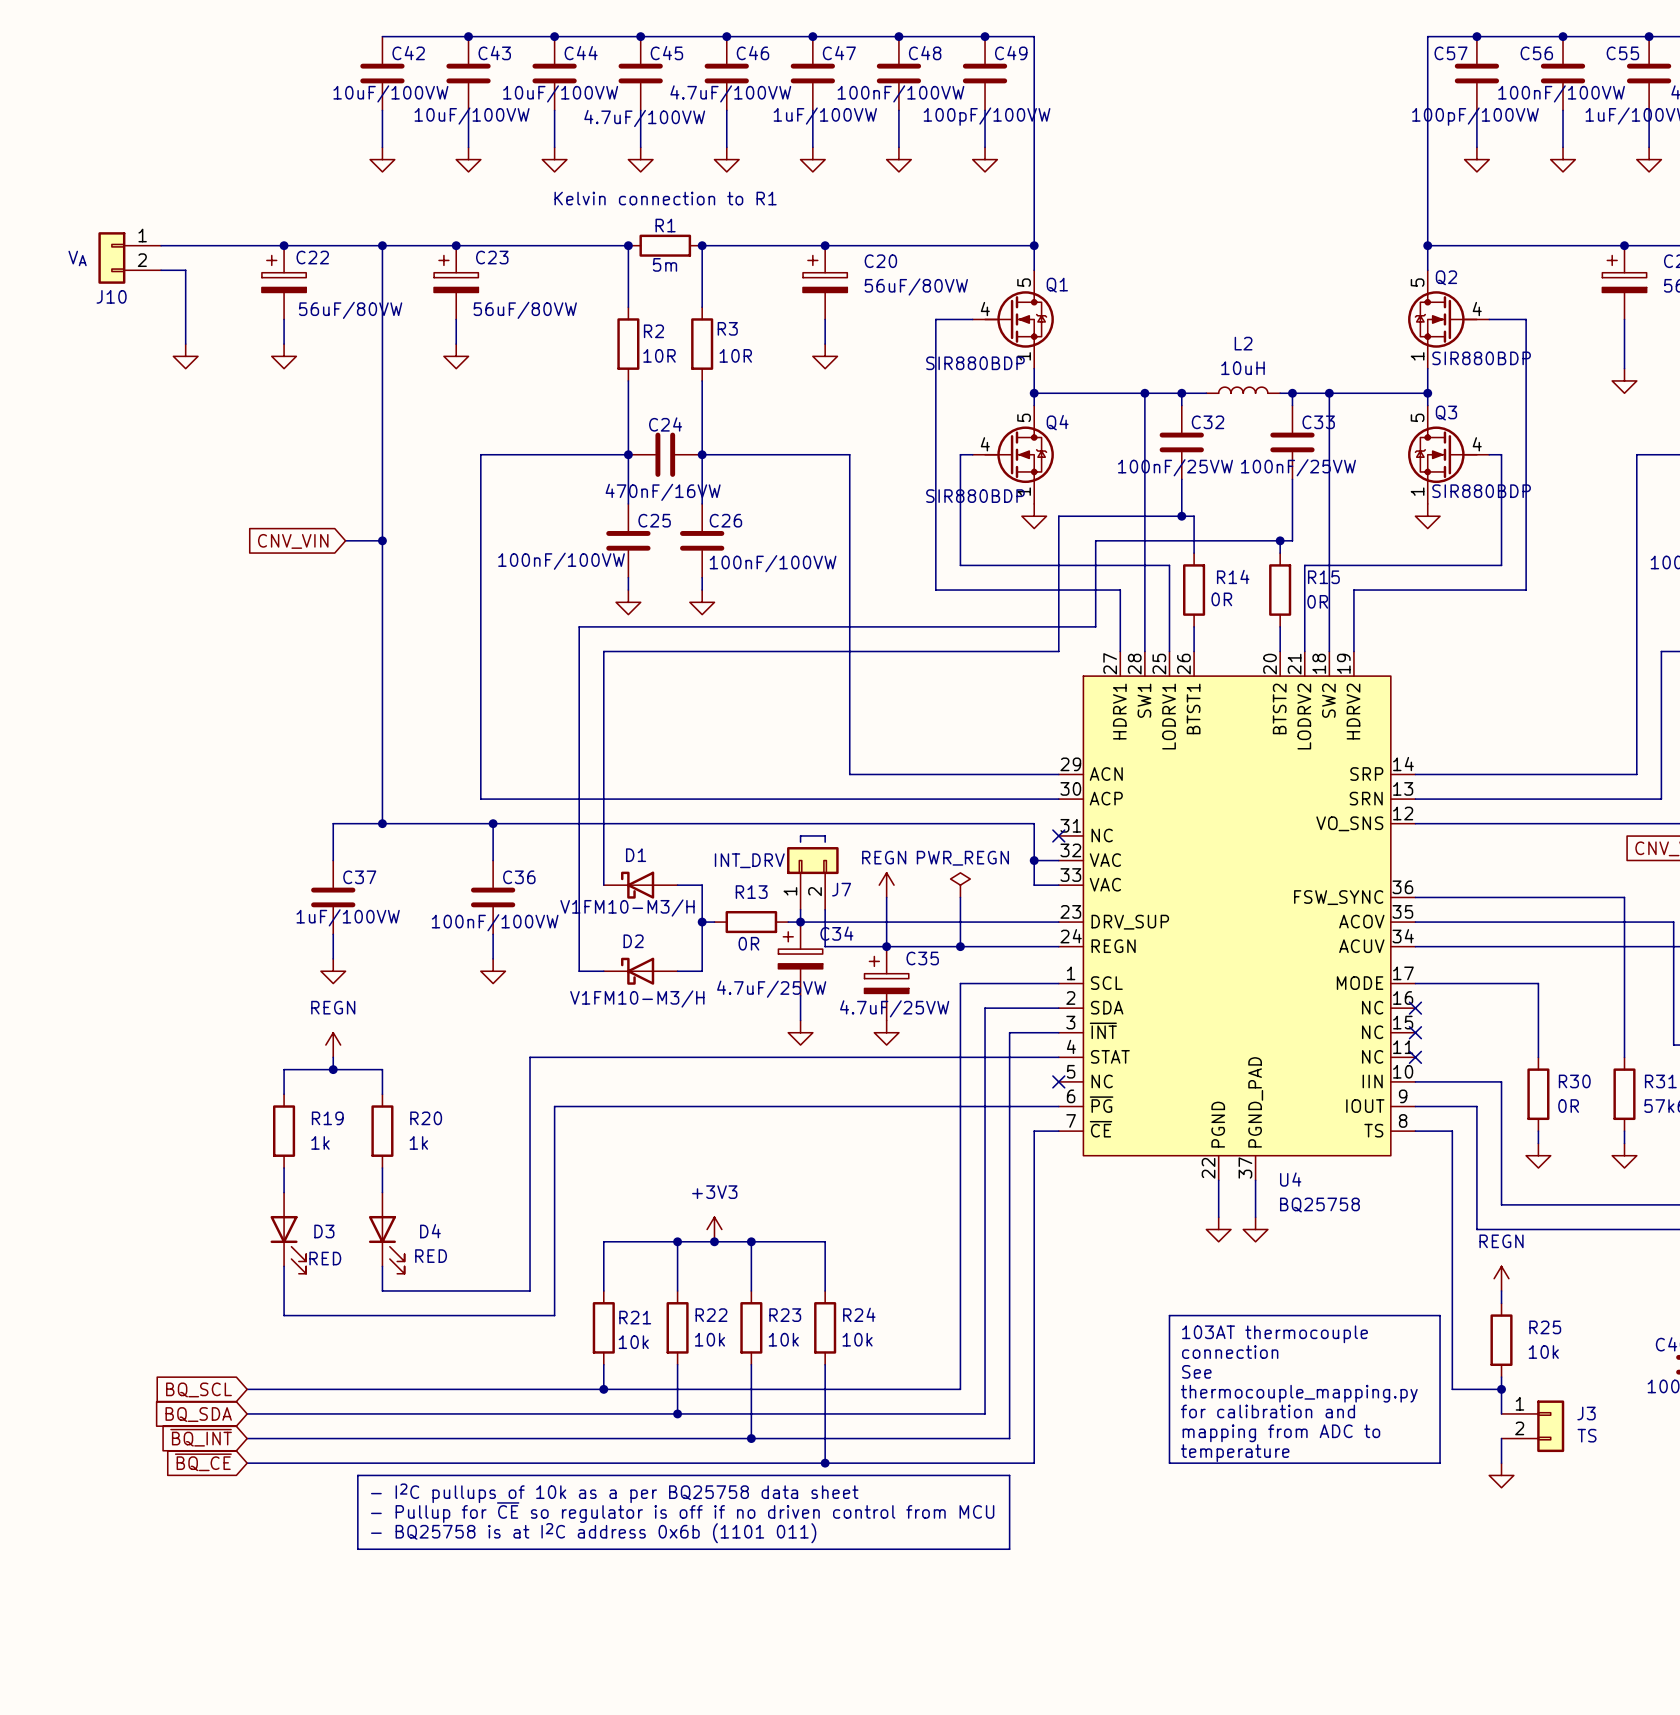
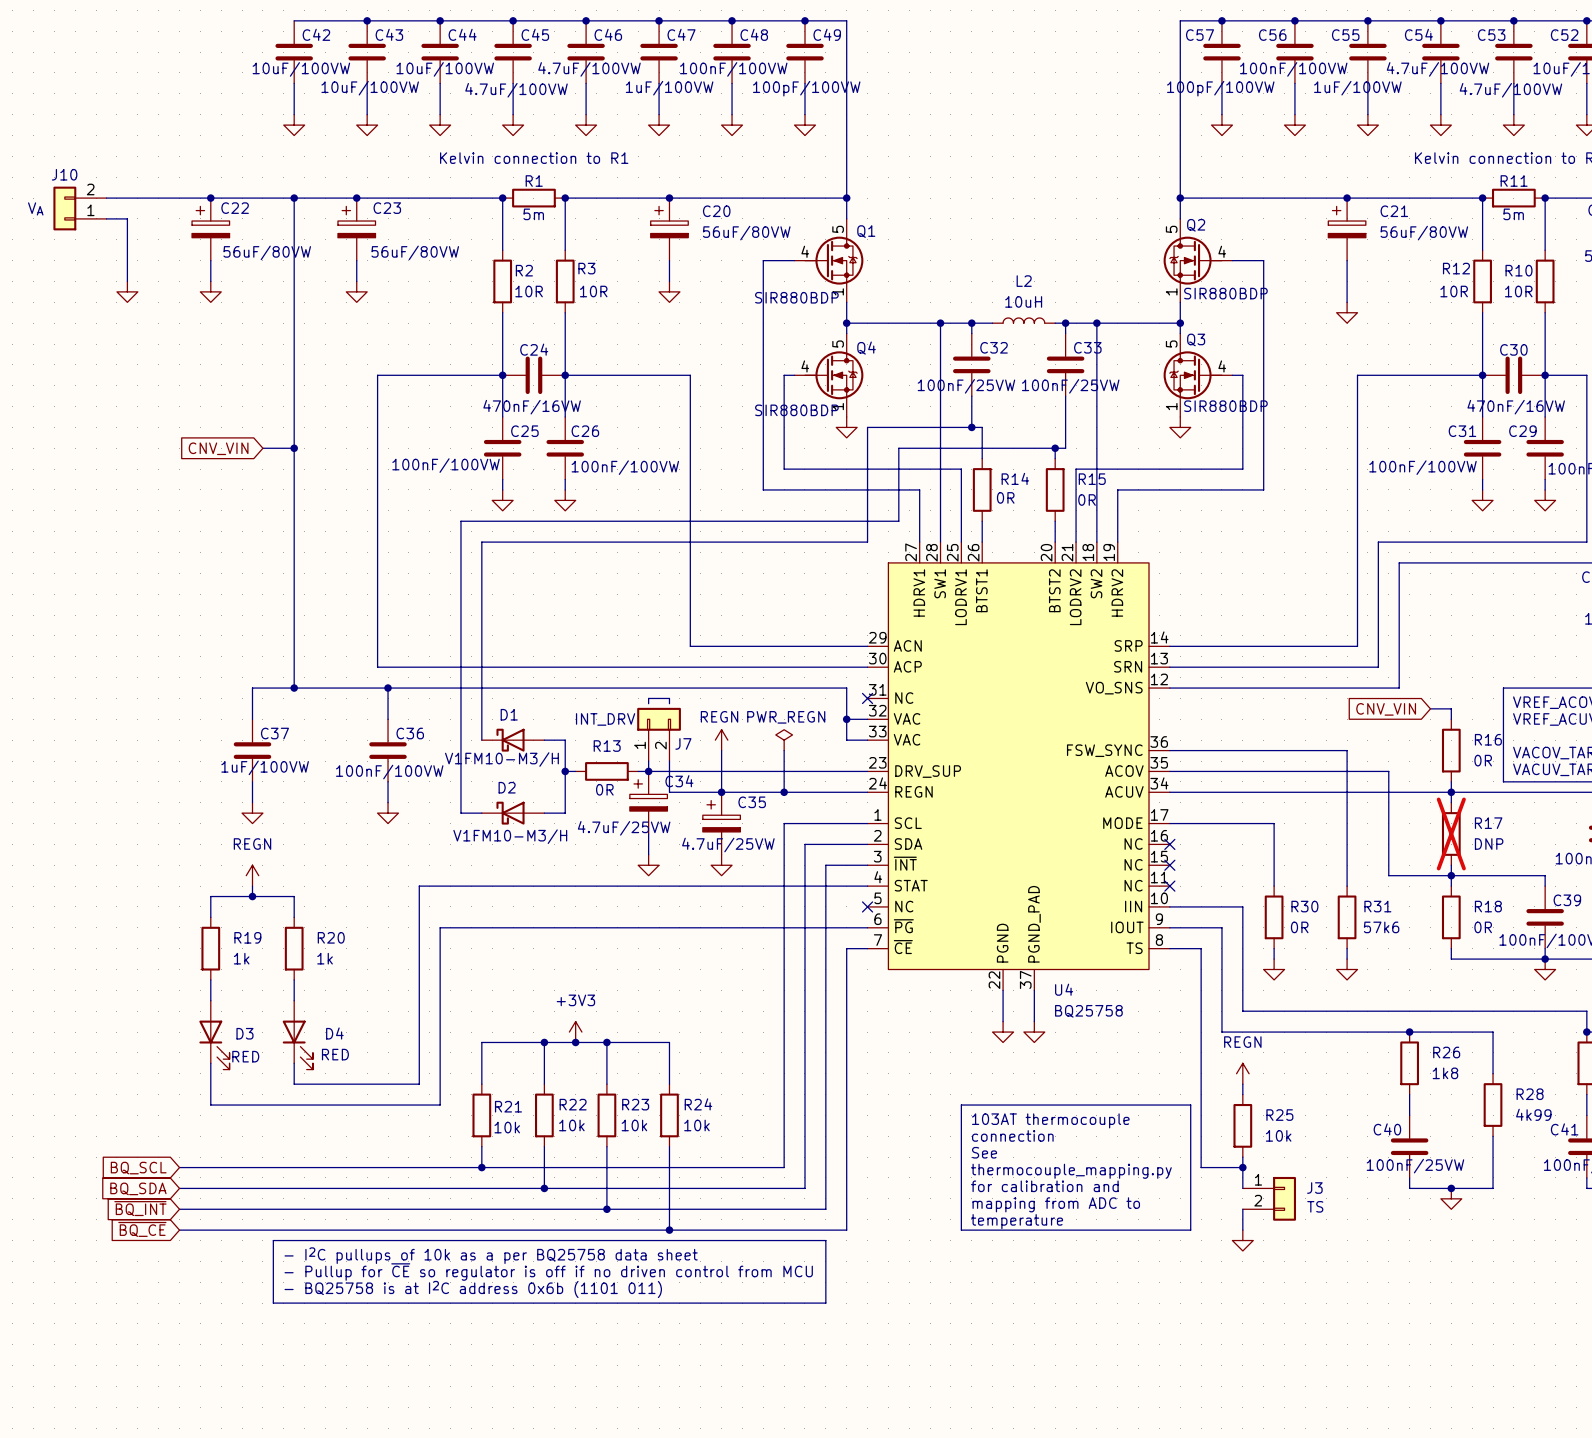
J10 flip: as is (111, 257) -> up-down (64, 208)

